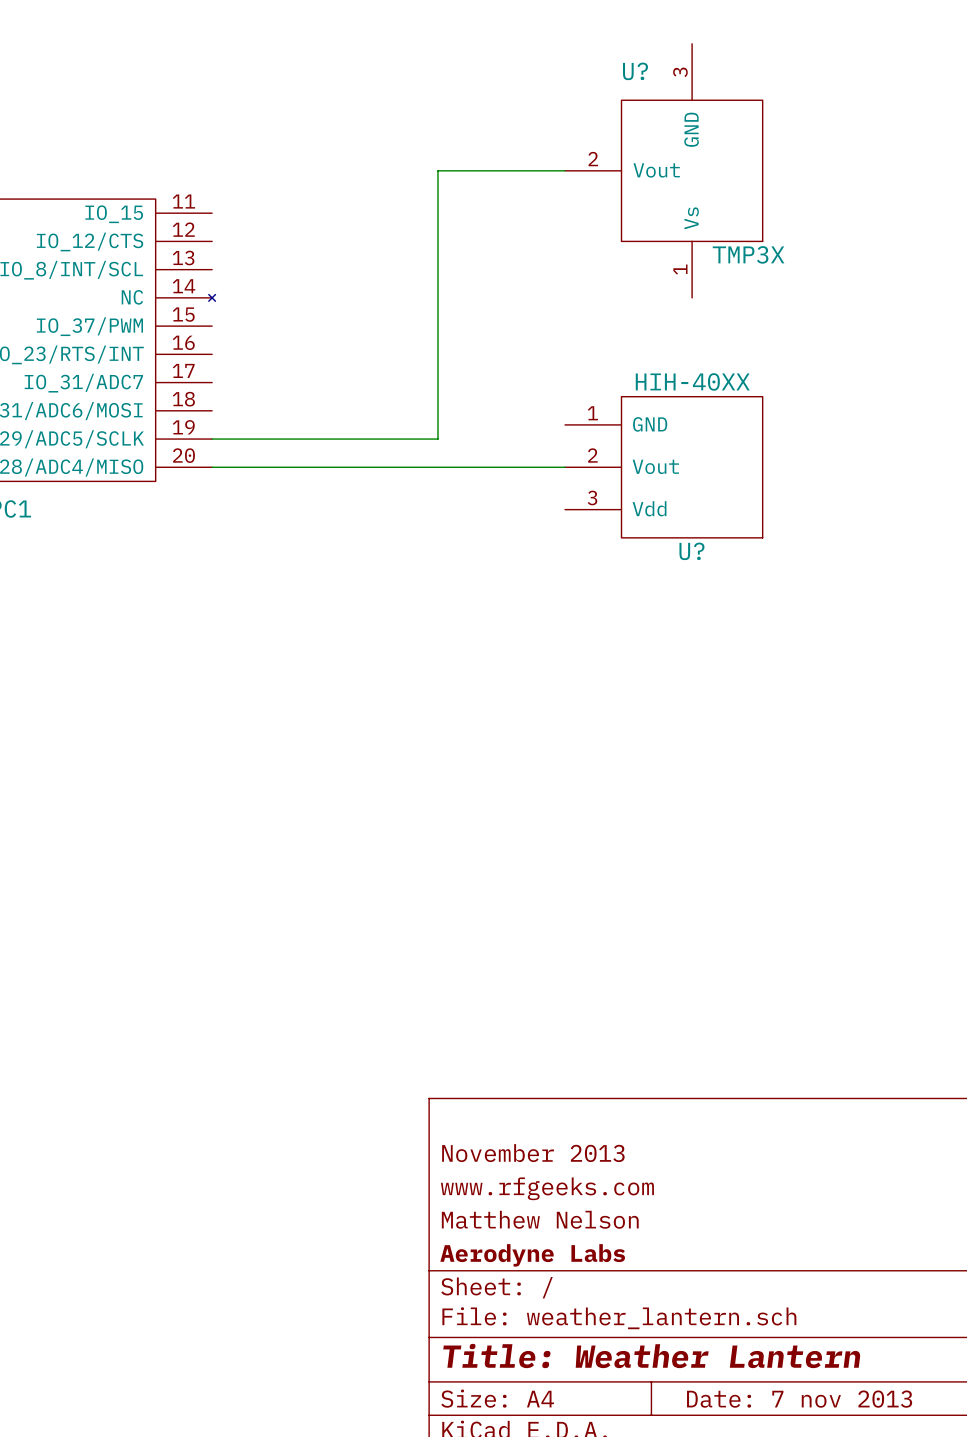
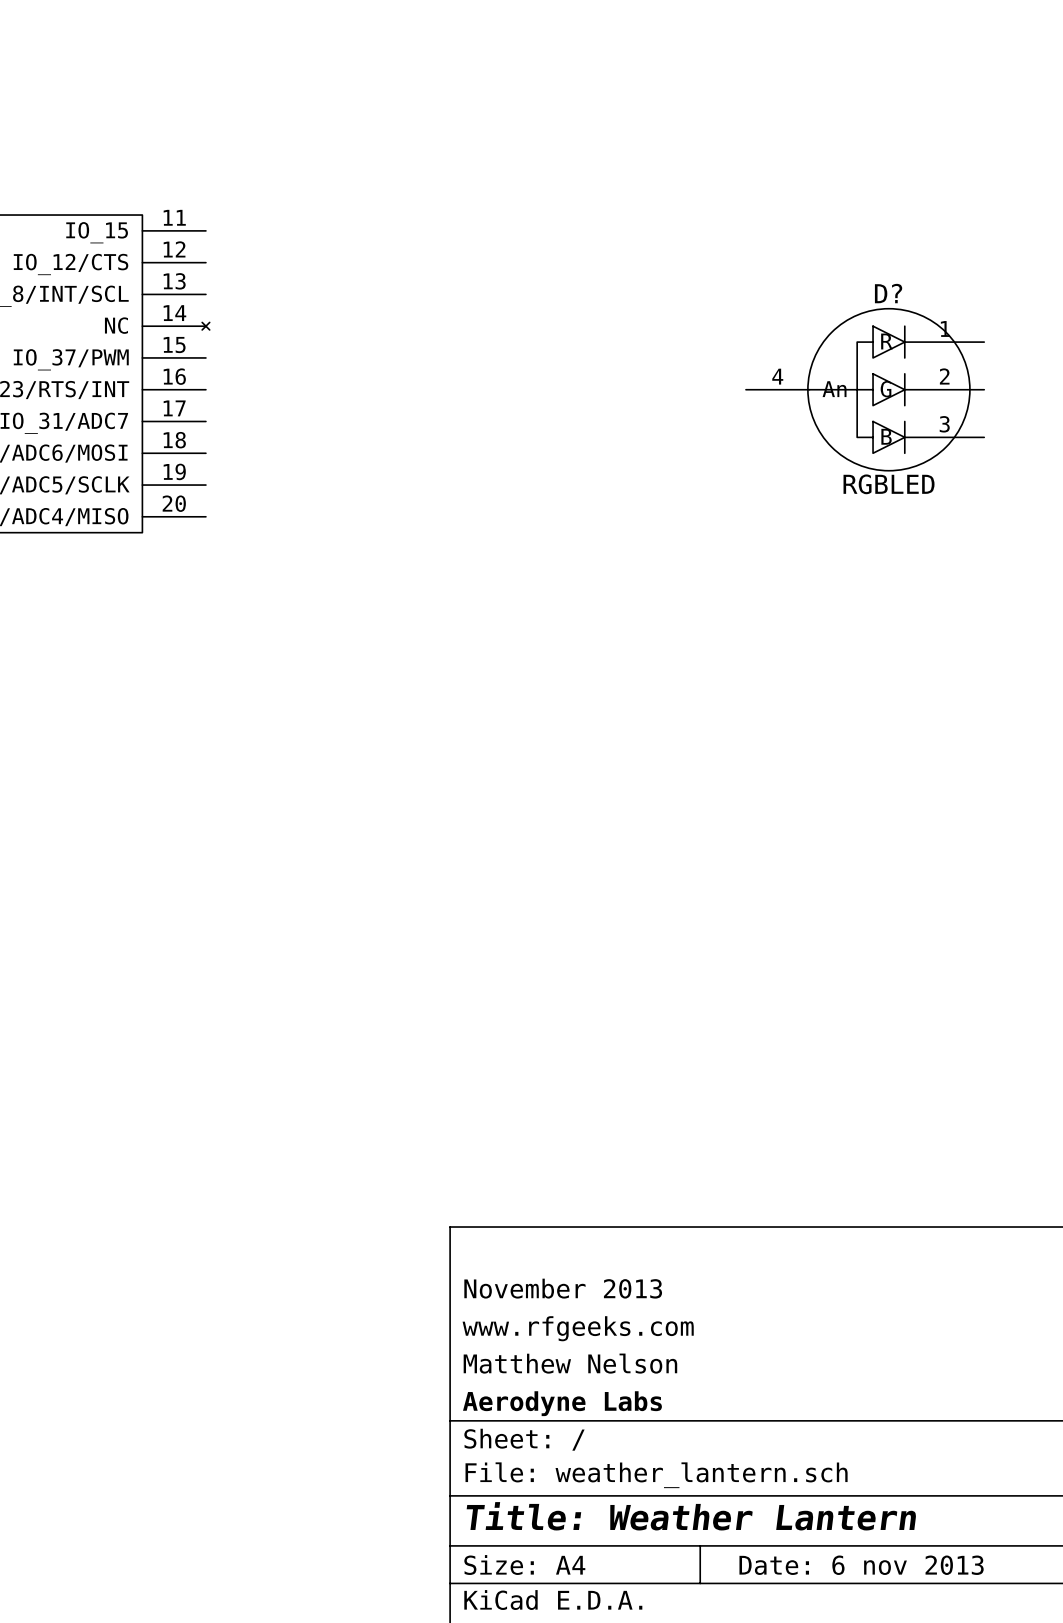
wire: (565, 170) (437, 170) (437, 439) (212, 439) -> none
U?: TMP3X (663, 170) -> none
D?: none -> RGBLED (865, 389)
U?: HIH-40XX (663, 460) -> none
wire: (212, 467) (565, 467) -> none
title block: Date: 7 nov 2013 (799, 1399) -> Date: 6 nov 2013 (861, 1565)

